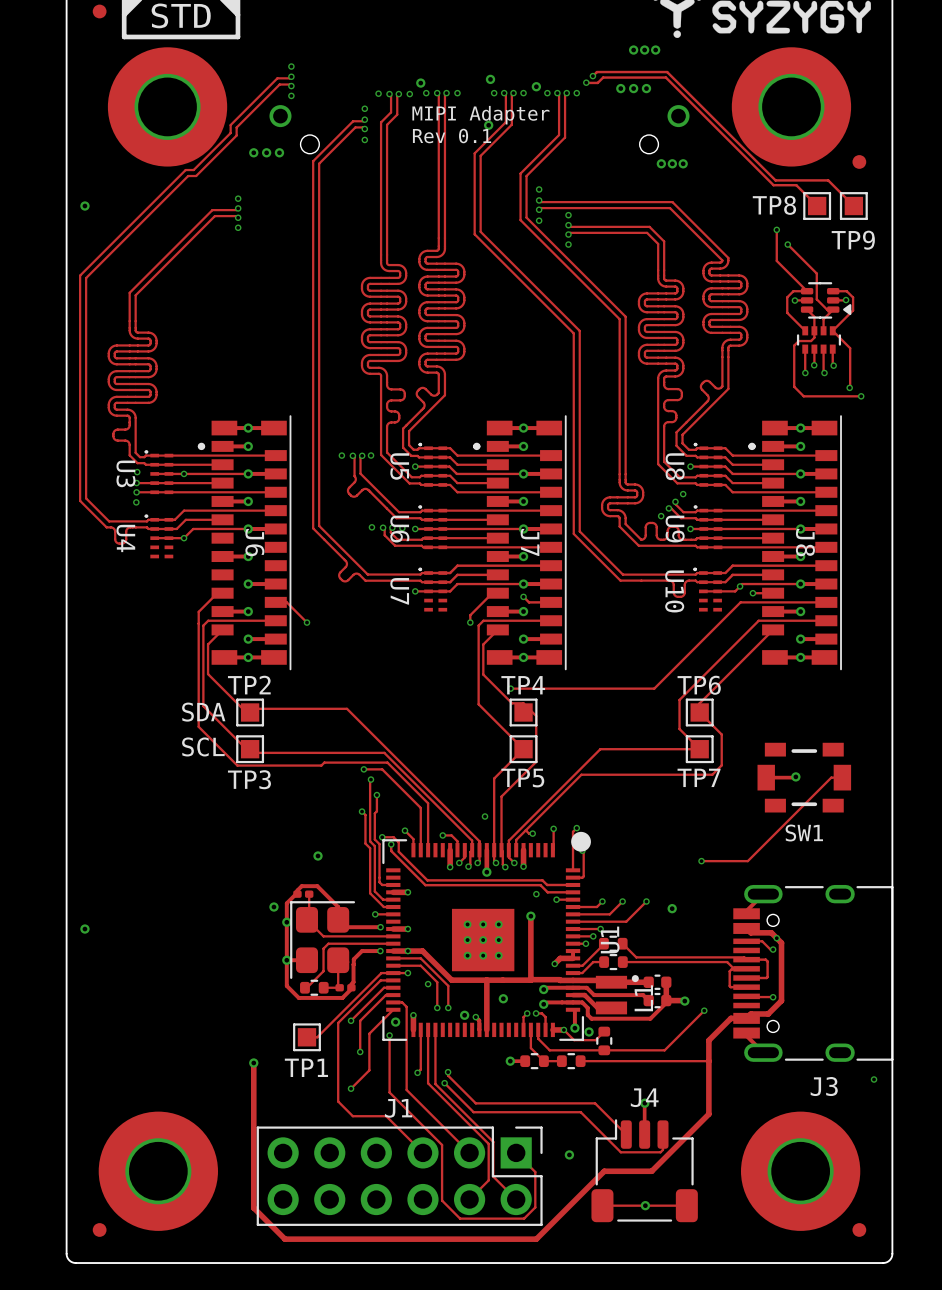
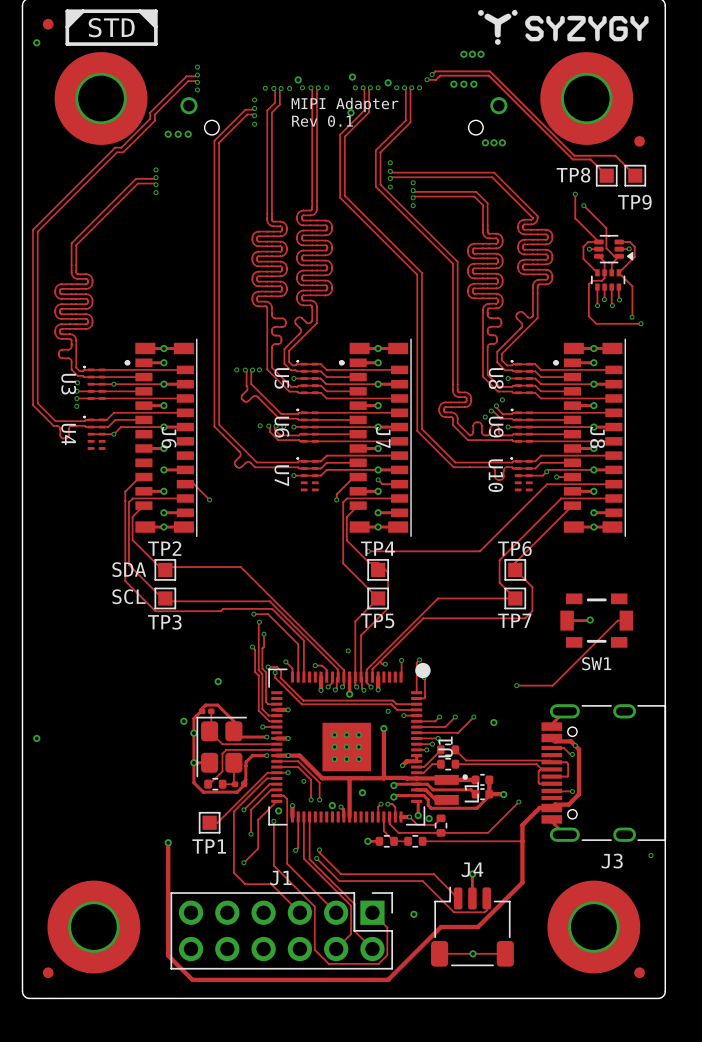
via: none -> (36, 42)
via: (84, 206) -> none

